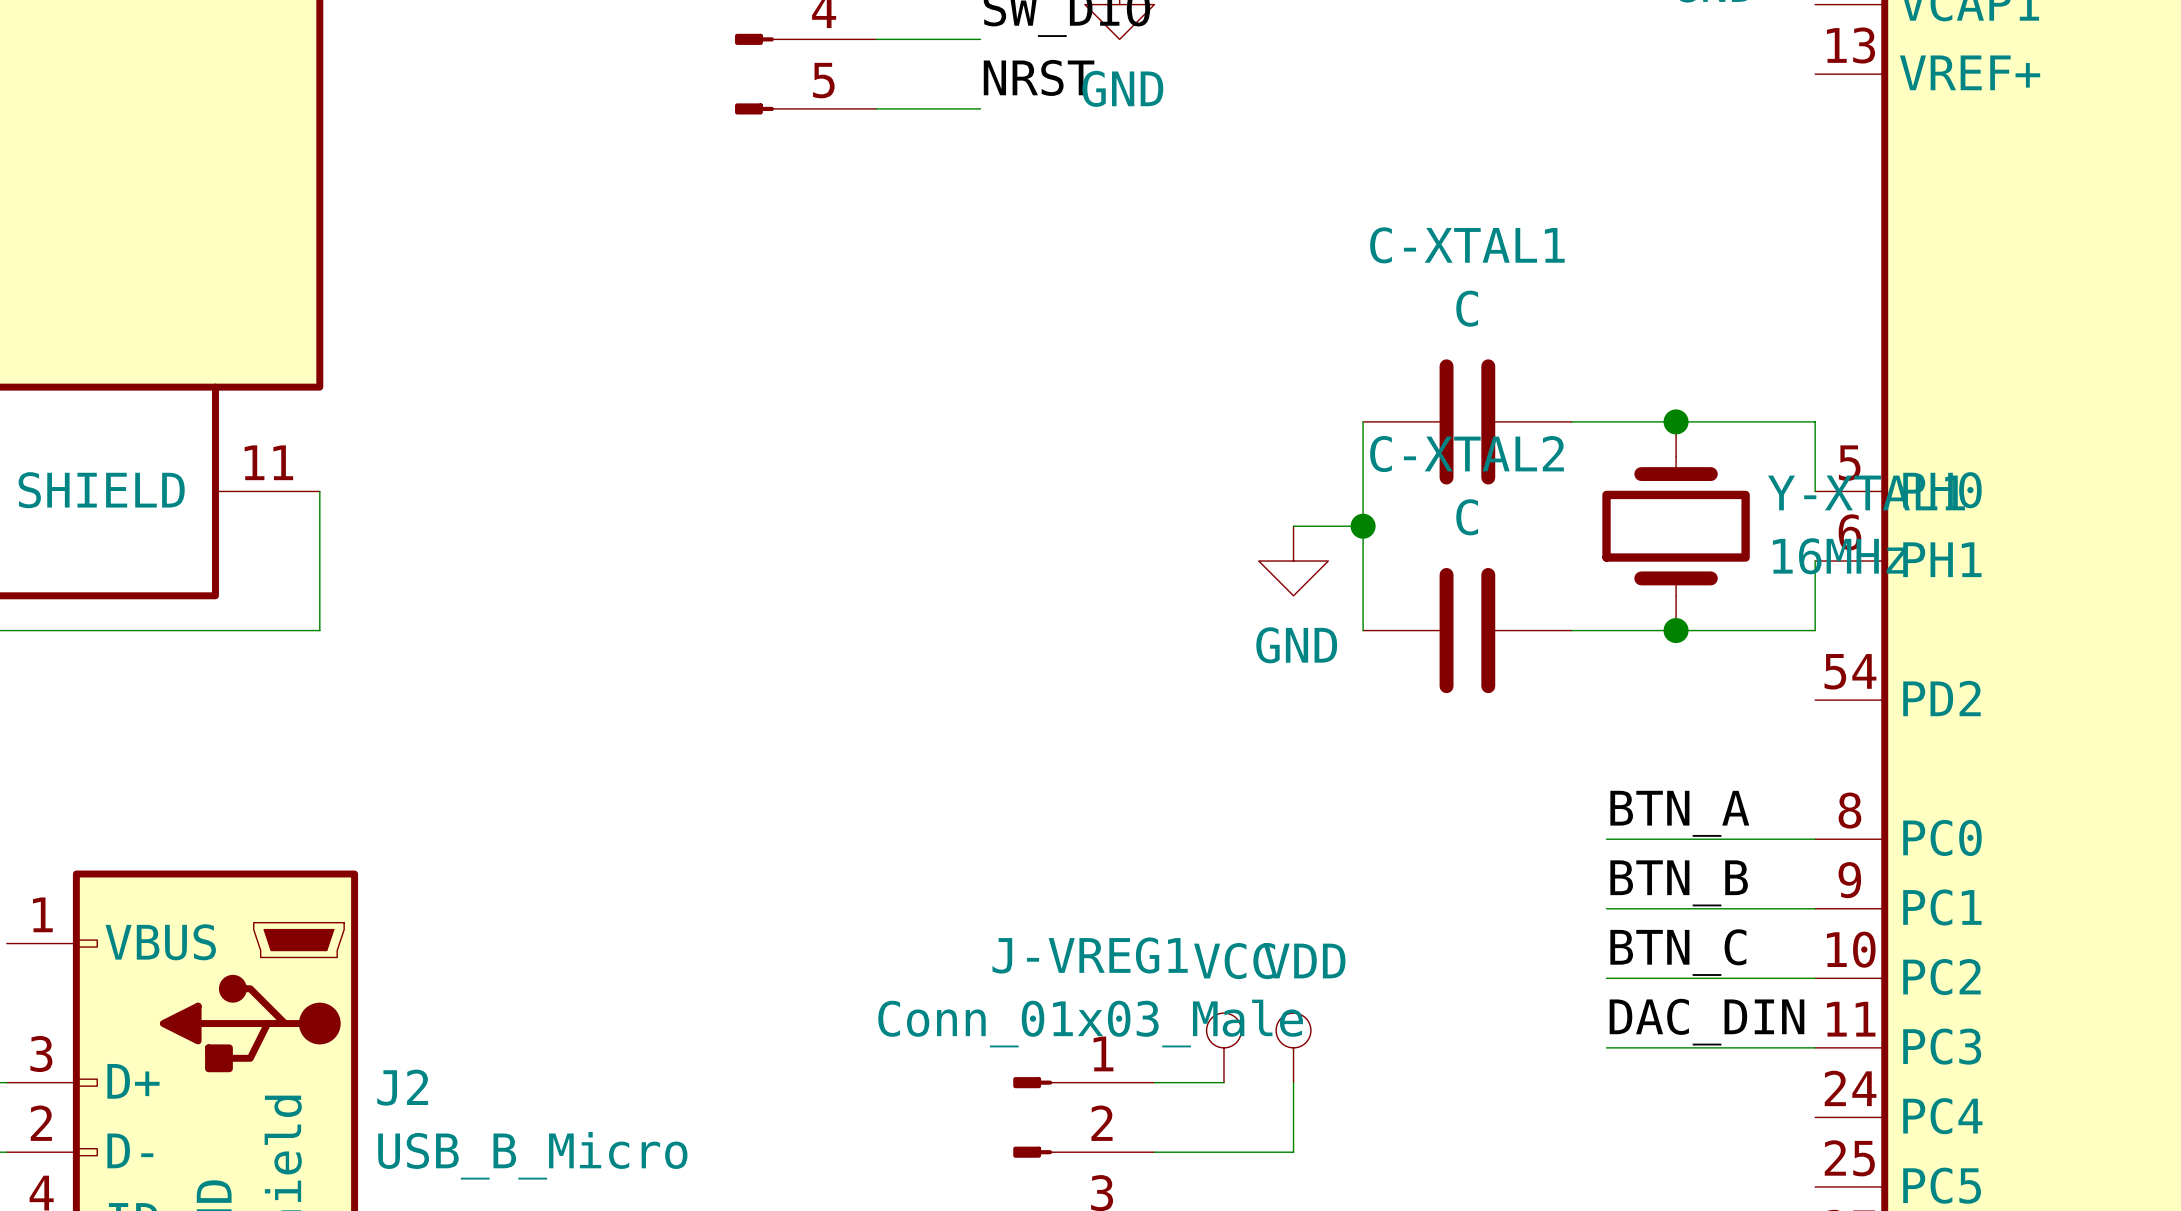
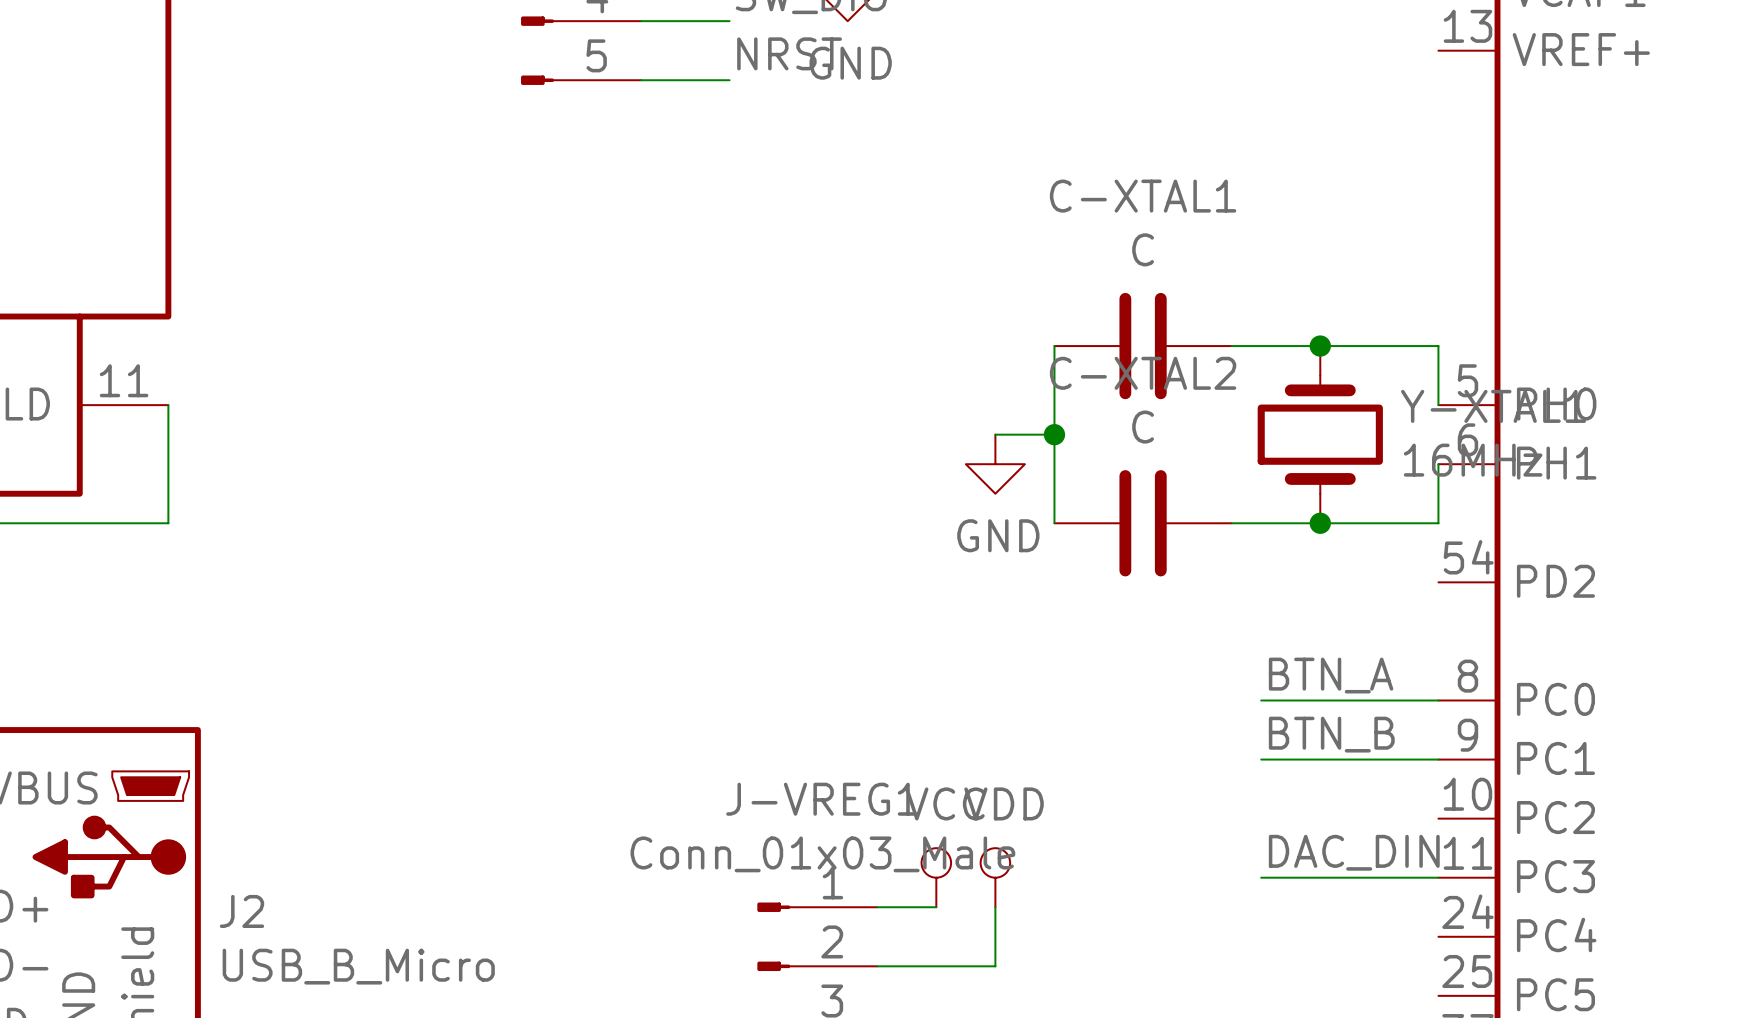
label: BTN_C (1678, 952) -> none
wire: (1606, 978) (1815, 978) -> none

